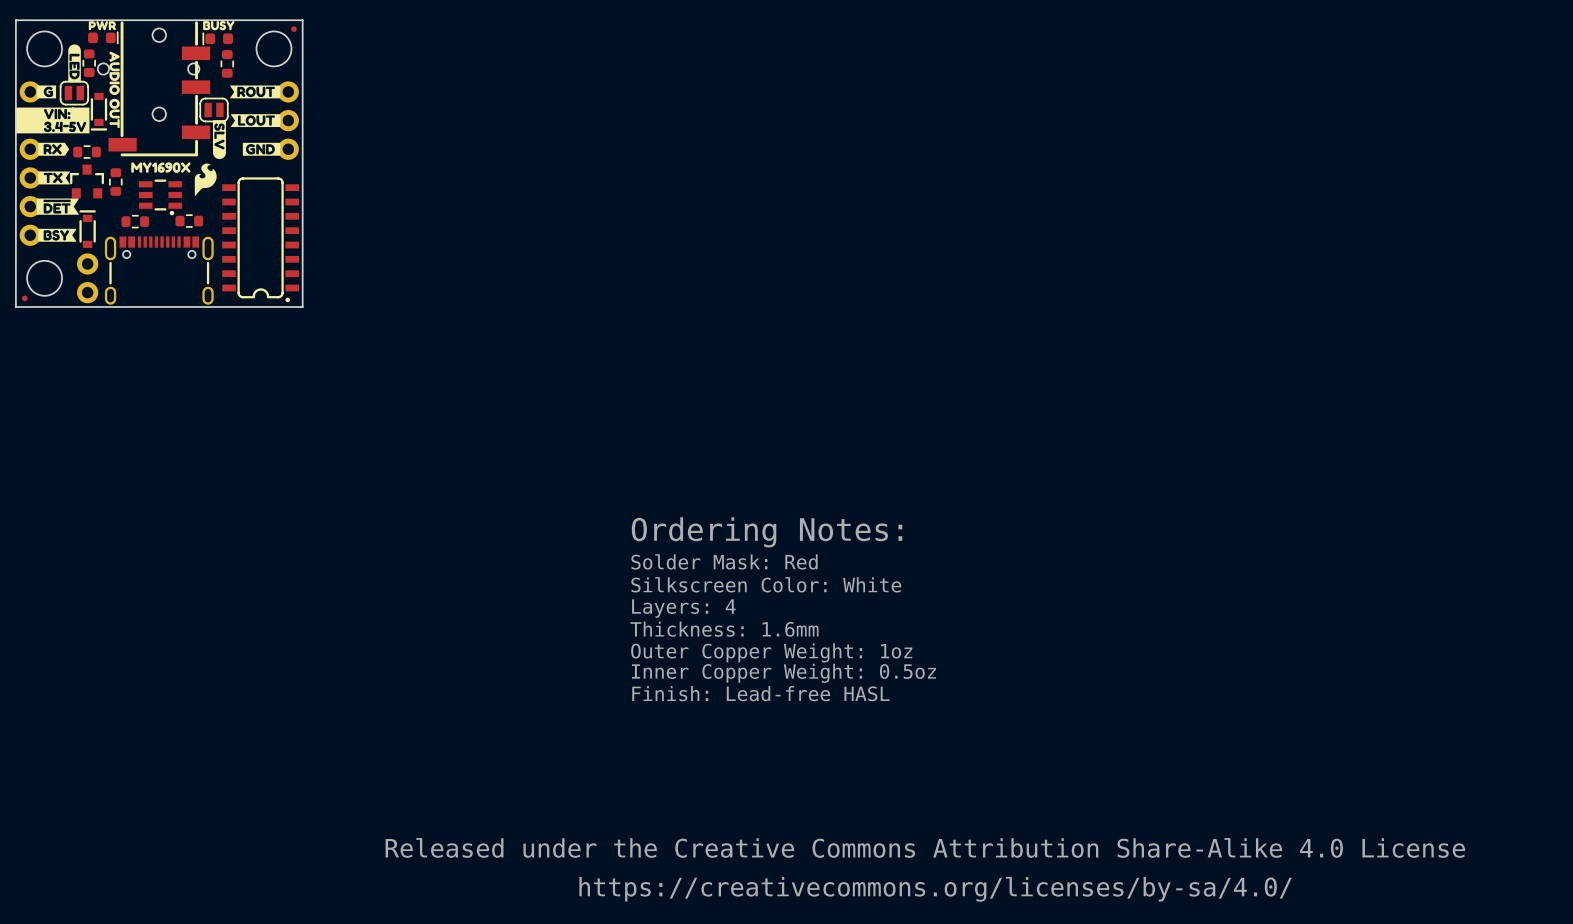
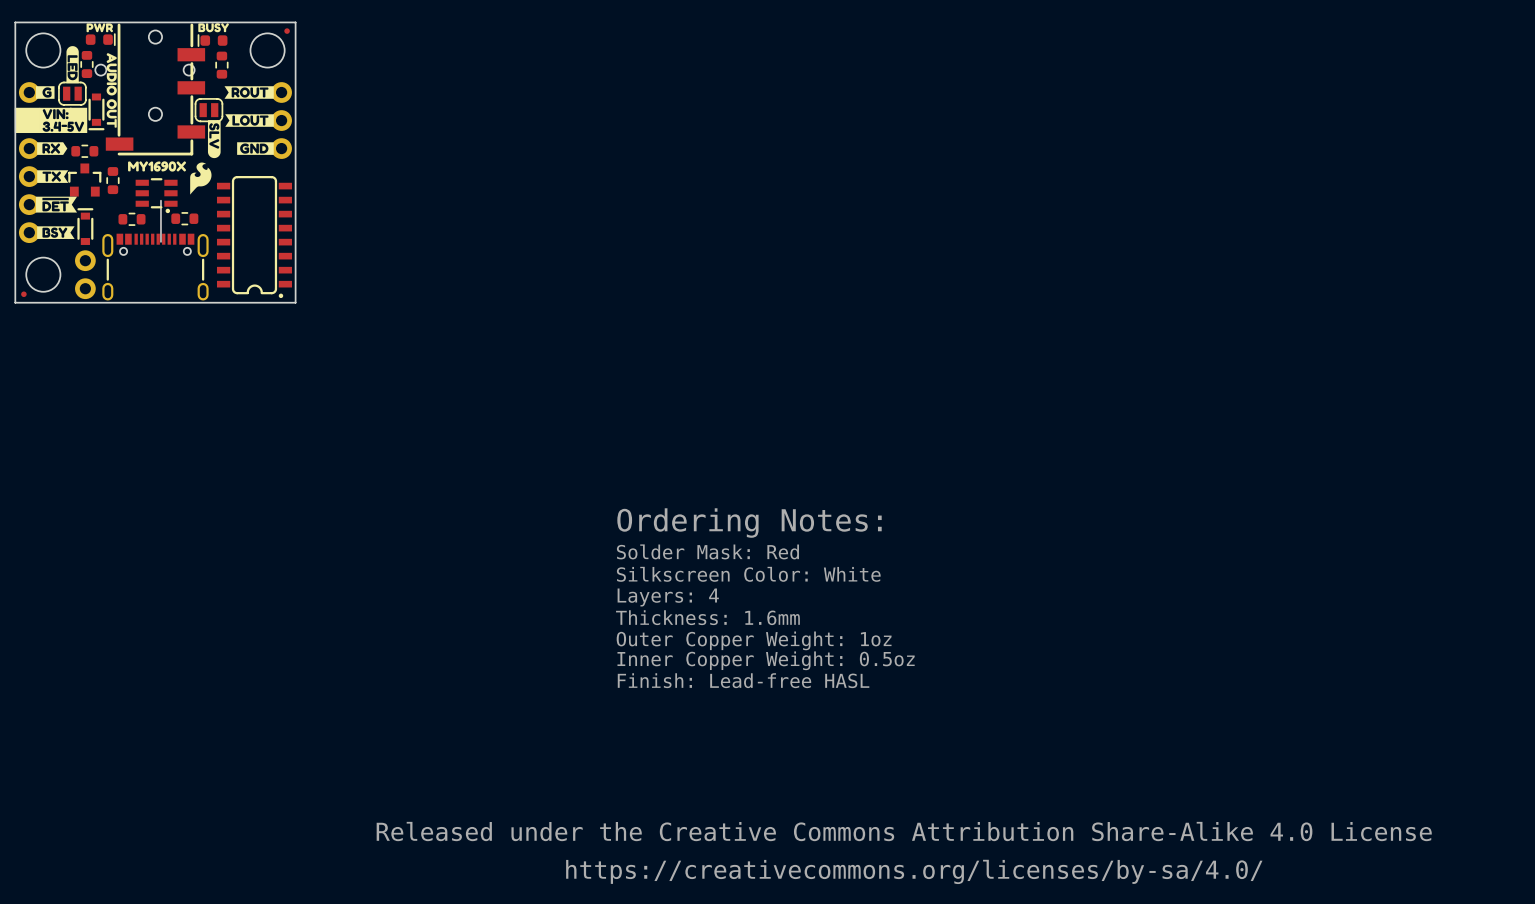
line: none -> (160, 200) (160, 241)

